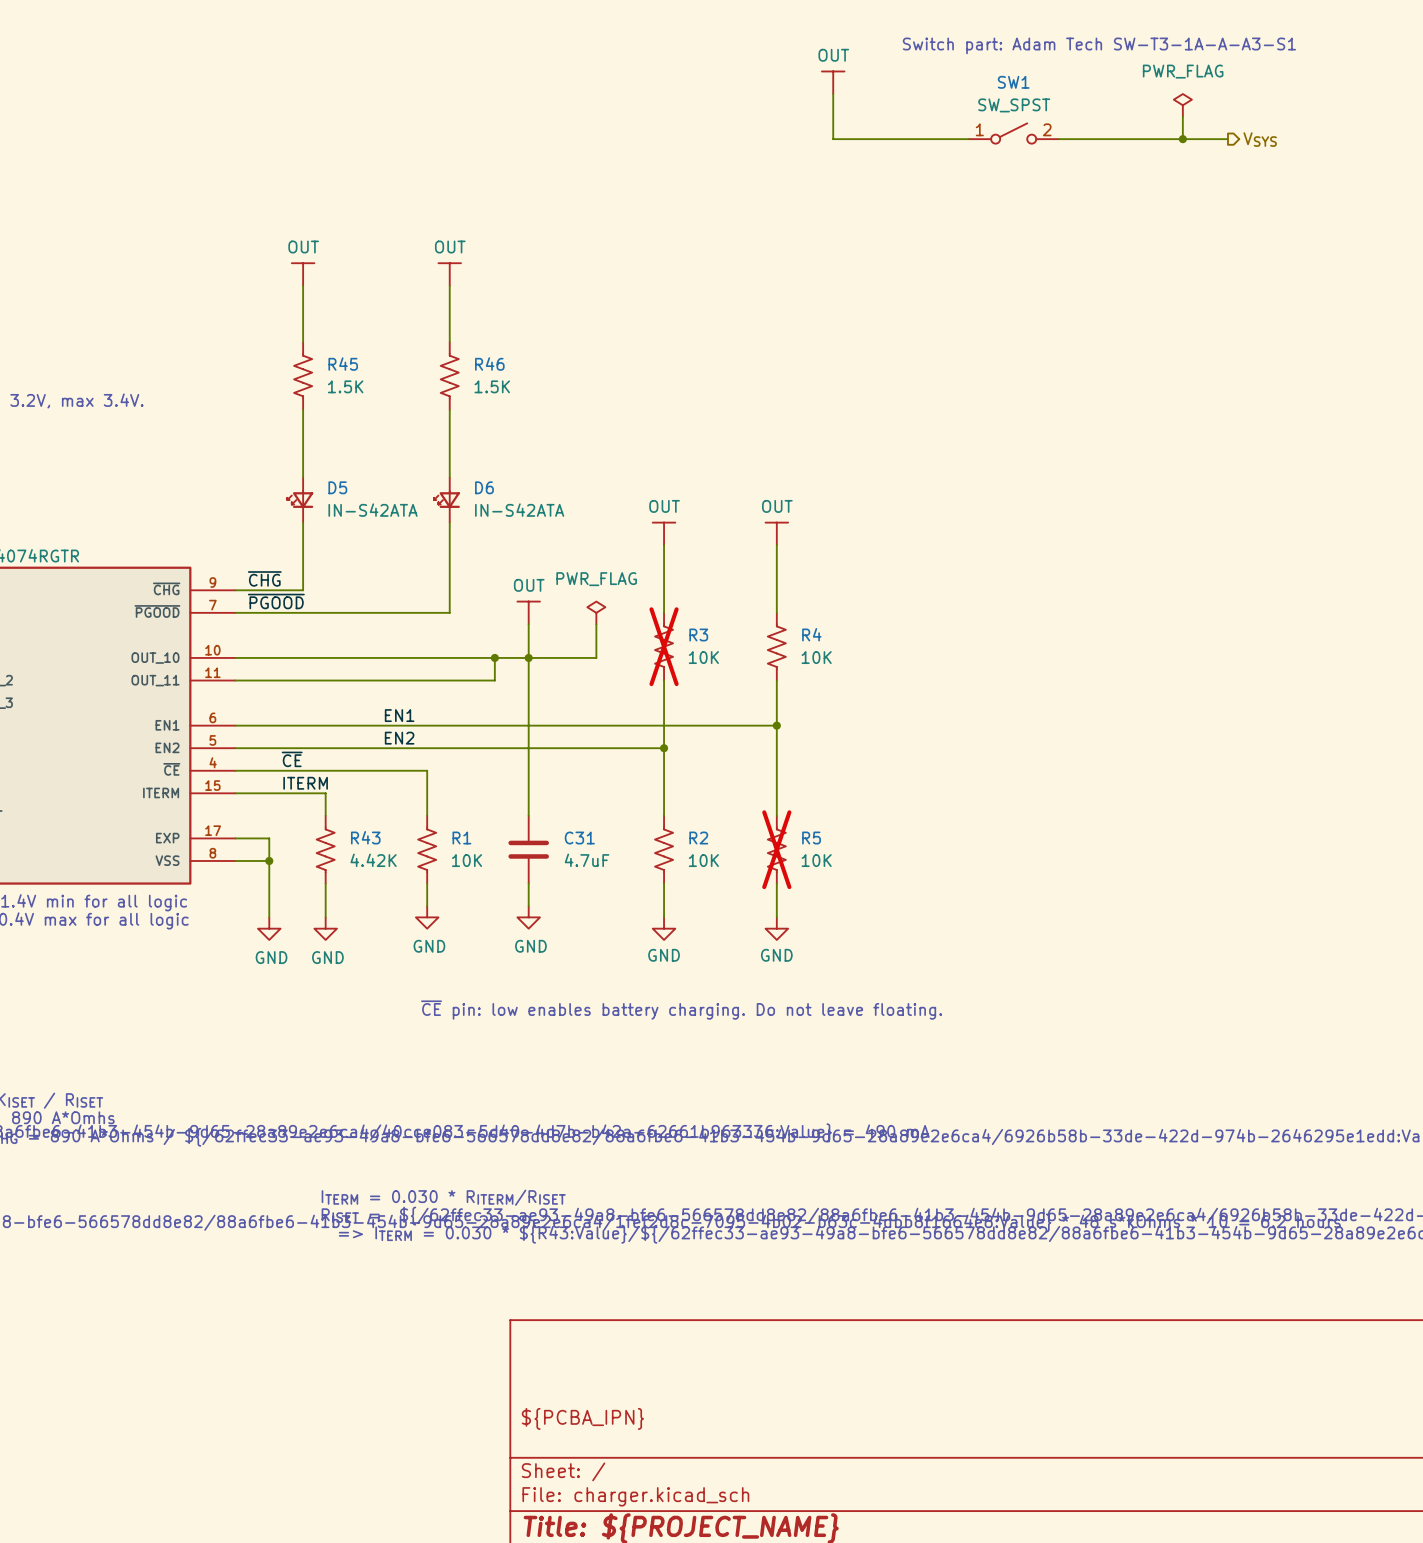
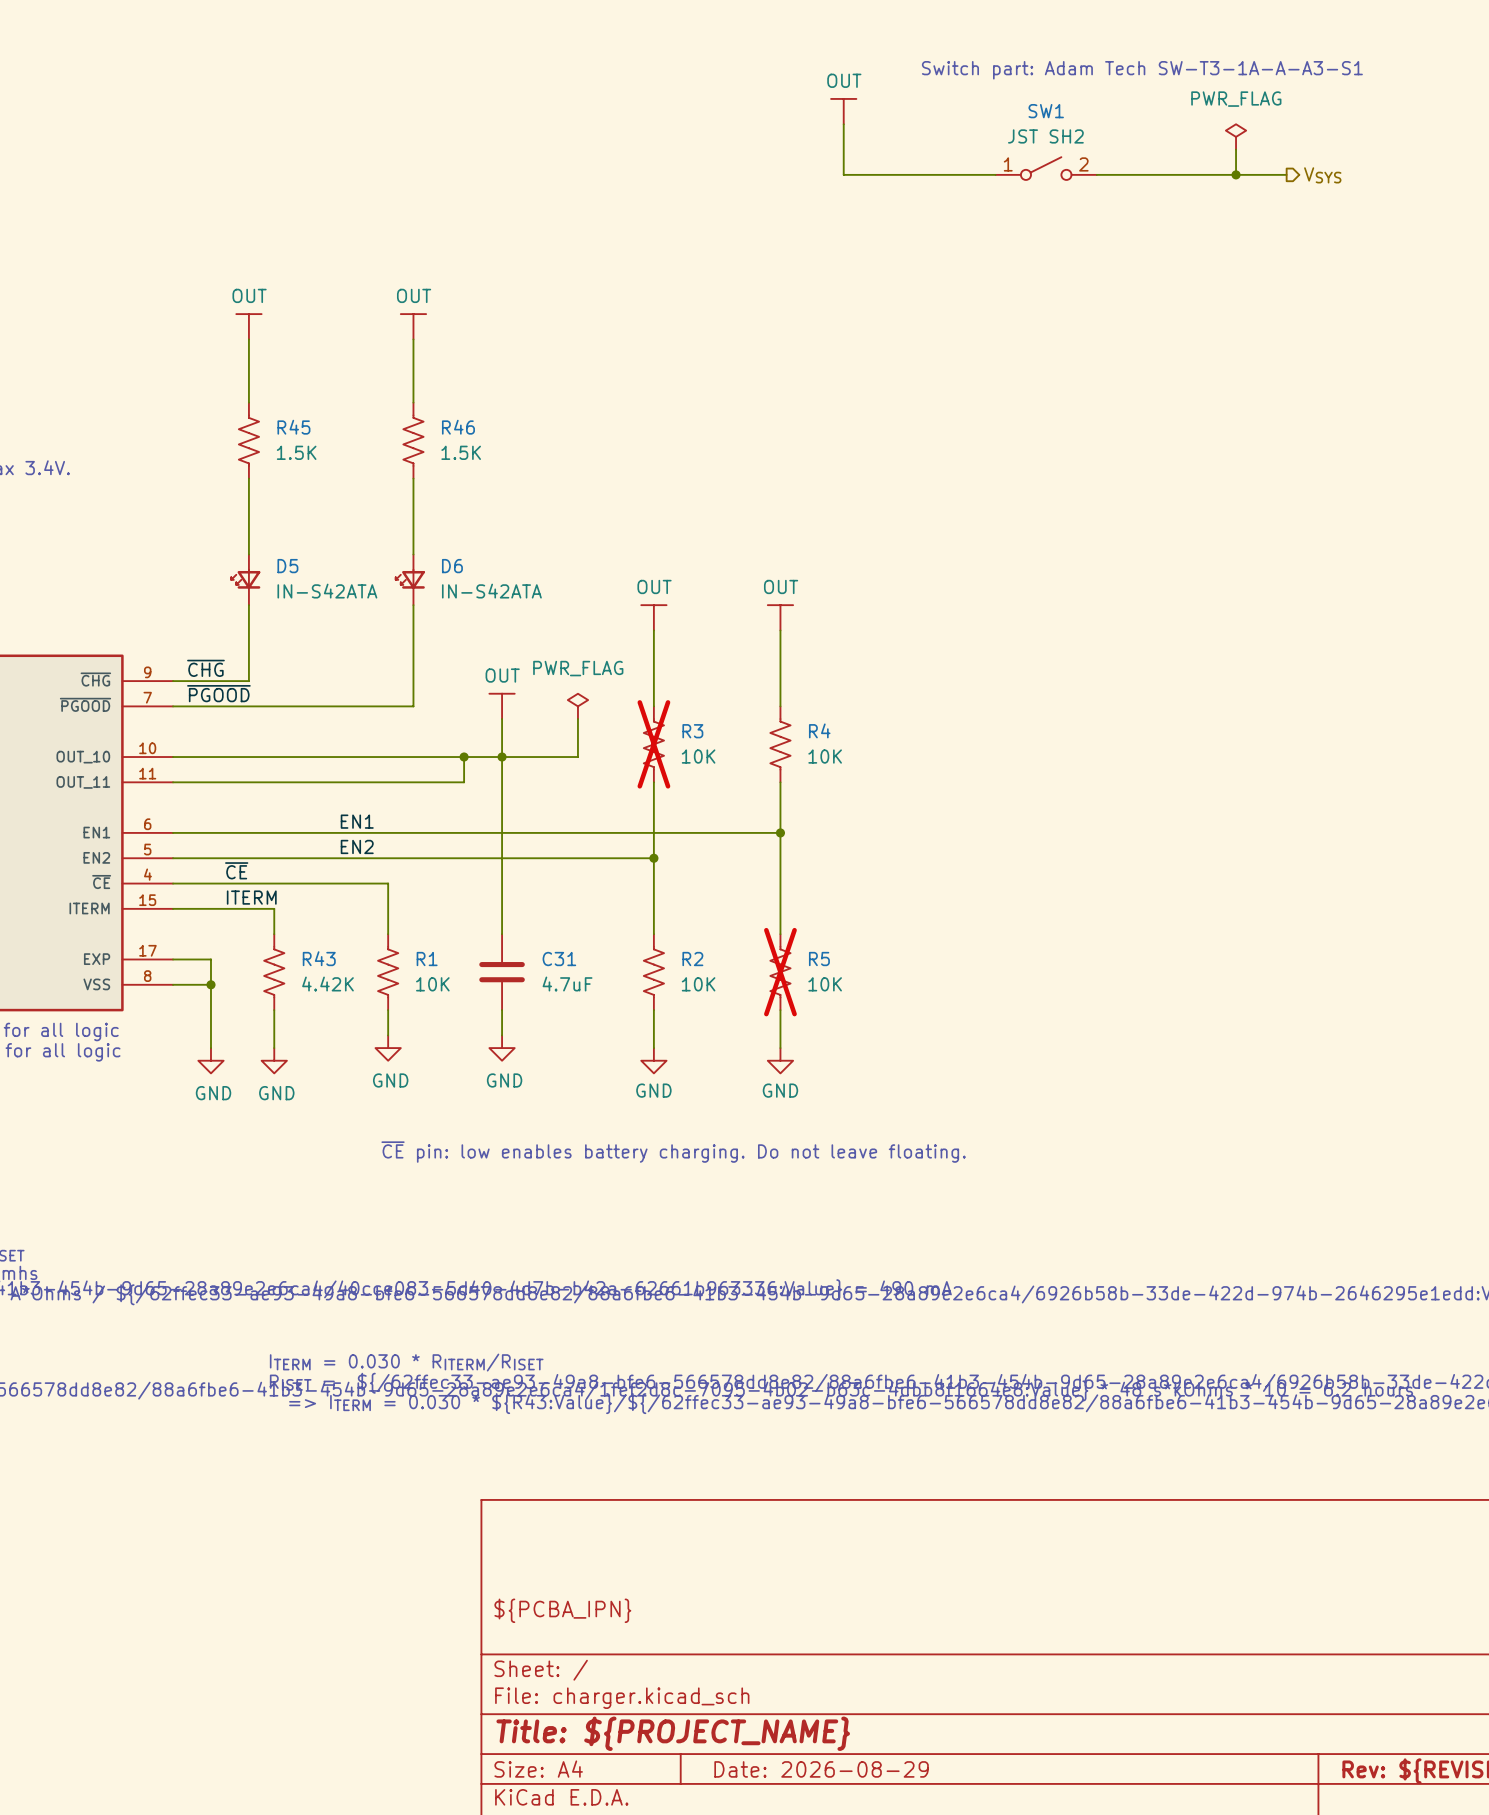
SW1 value: SW_SPST (1014, 105) -> JST SH2 (1045, 136)

